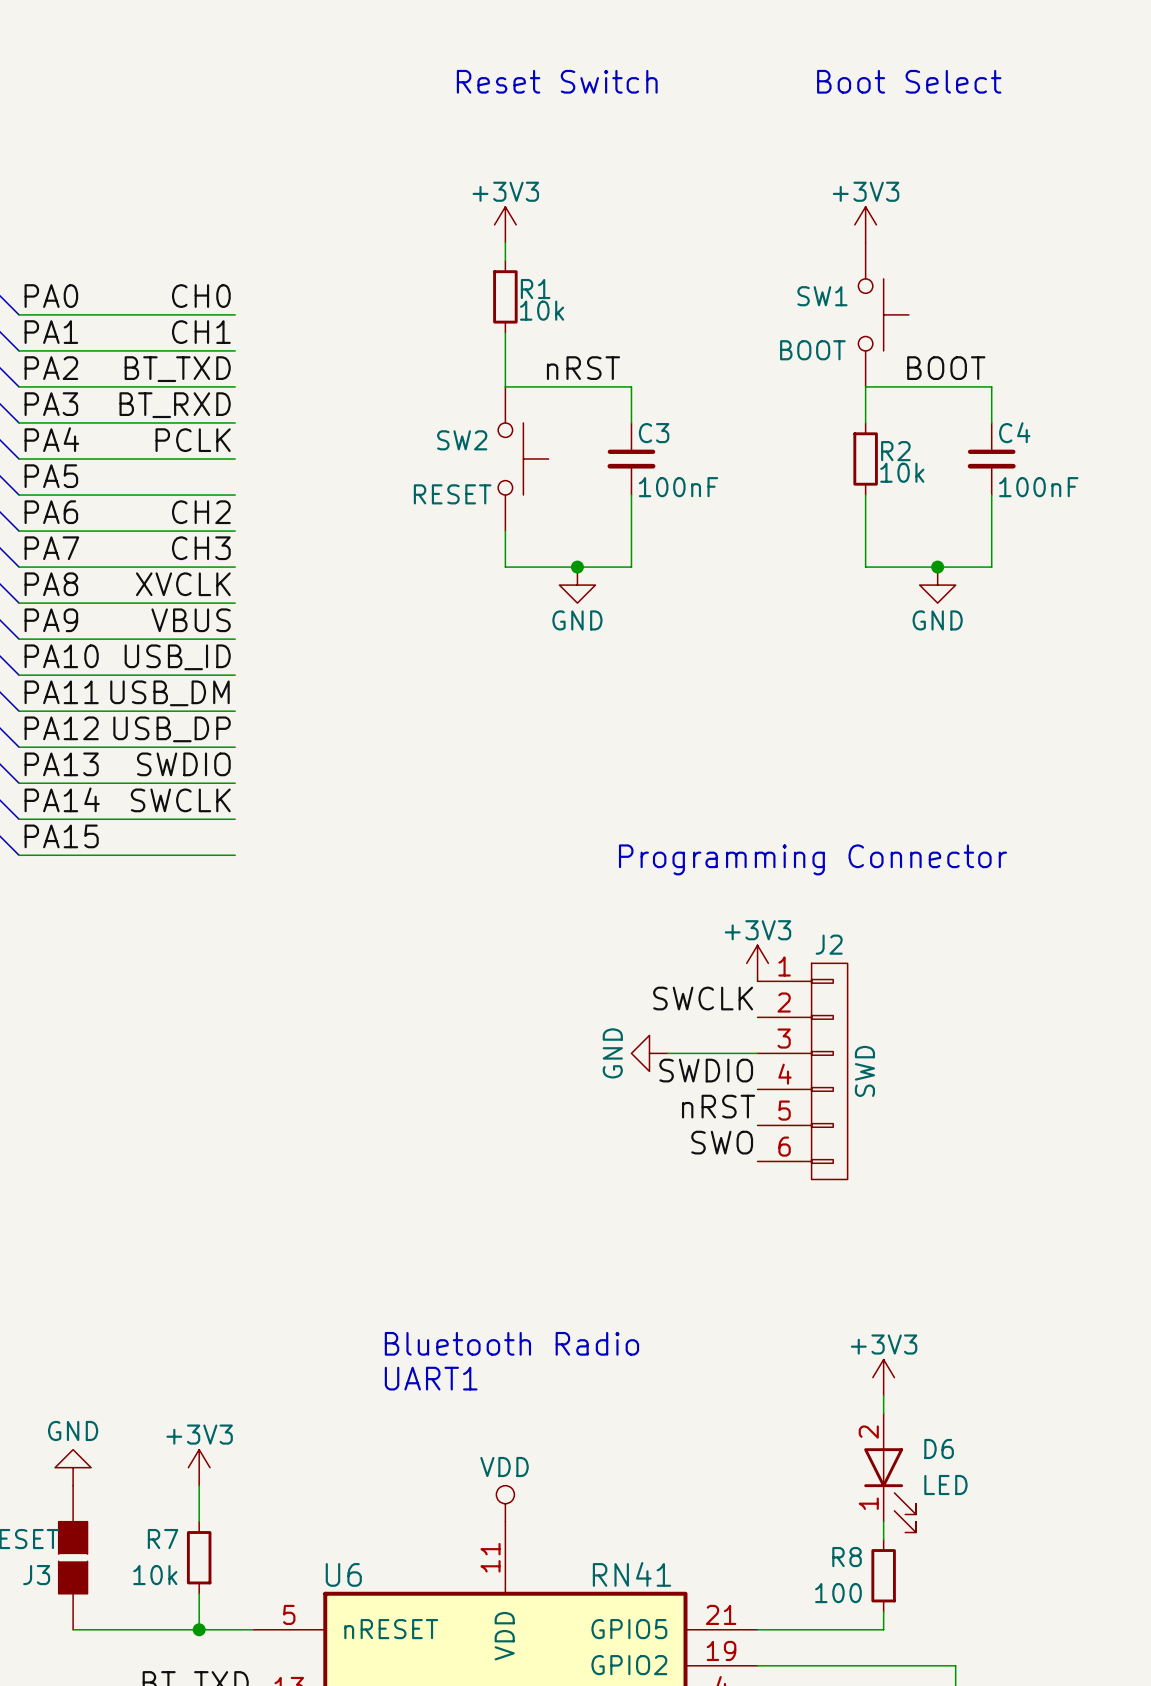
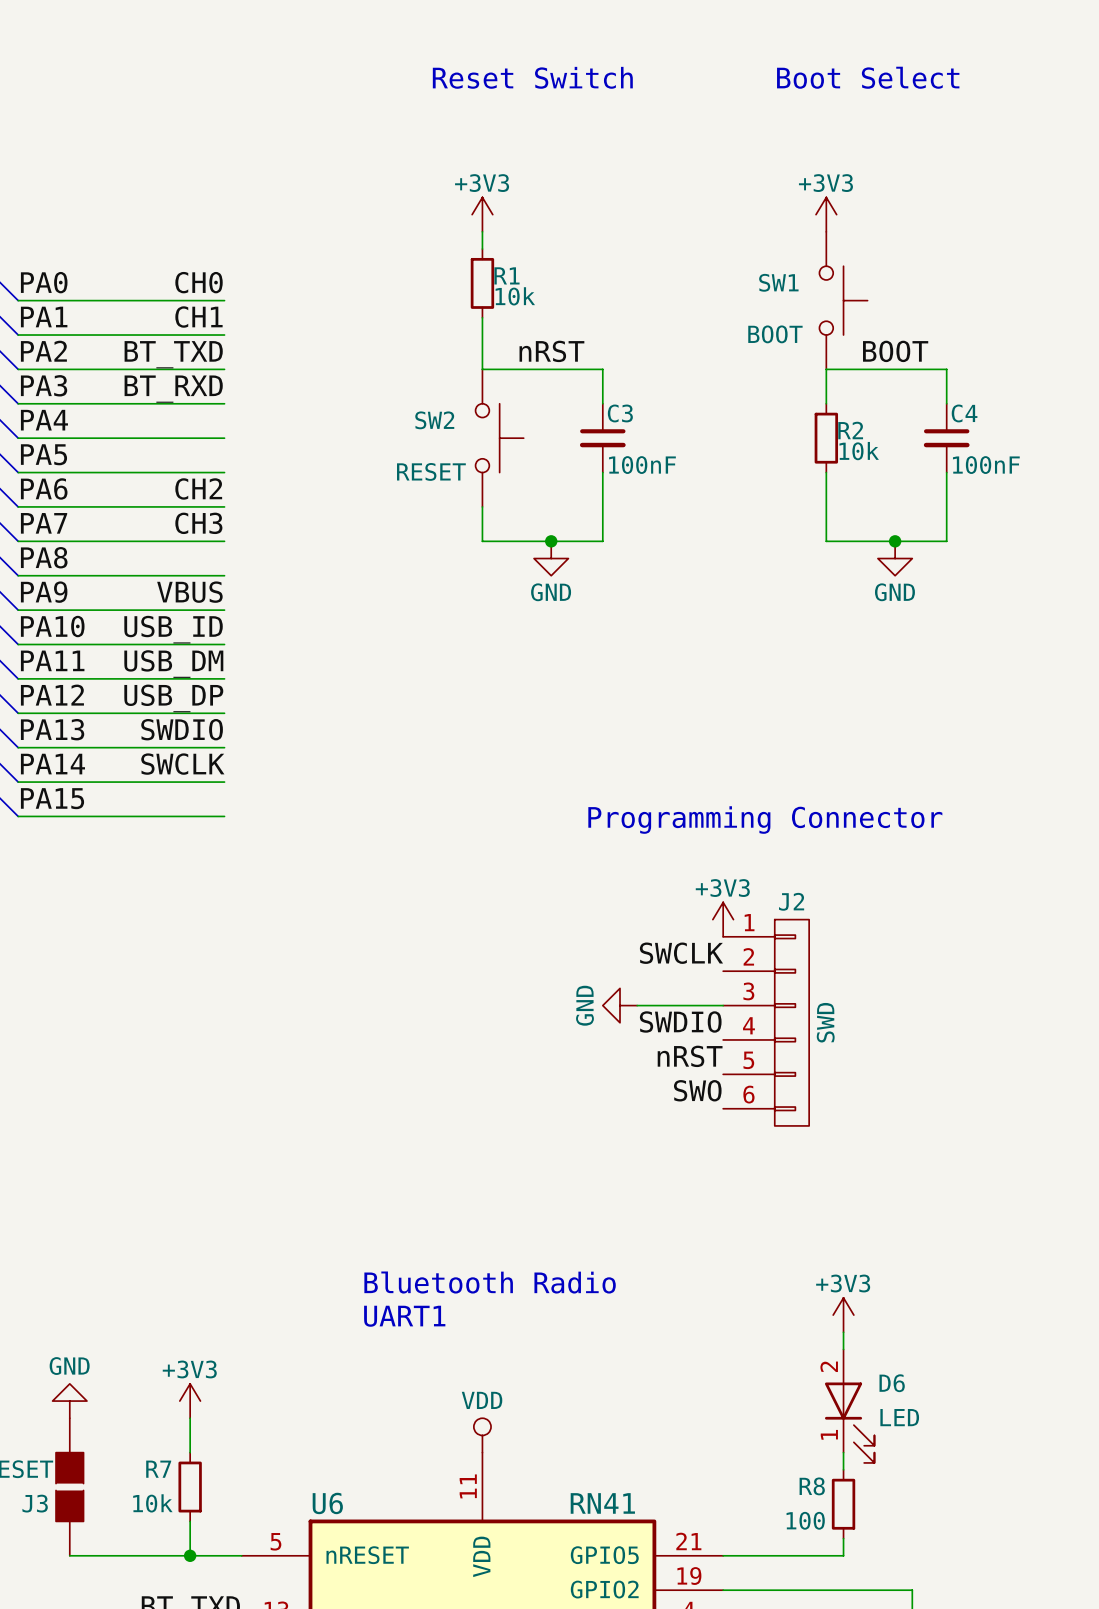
label: PCLK (193, 440) -> none
label: XVCLK (183, 584) -> none

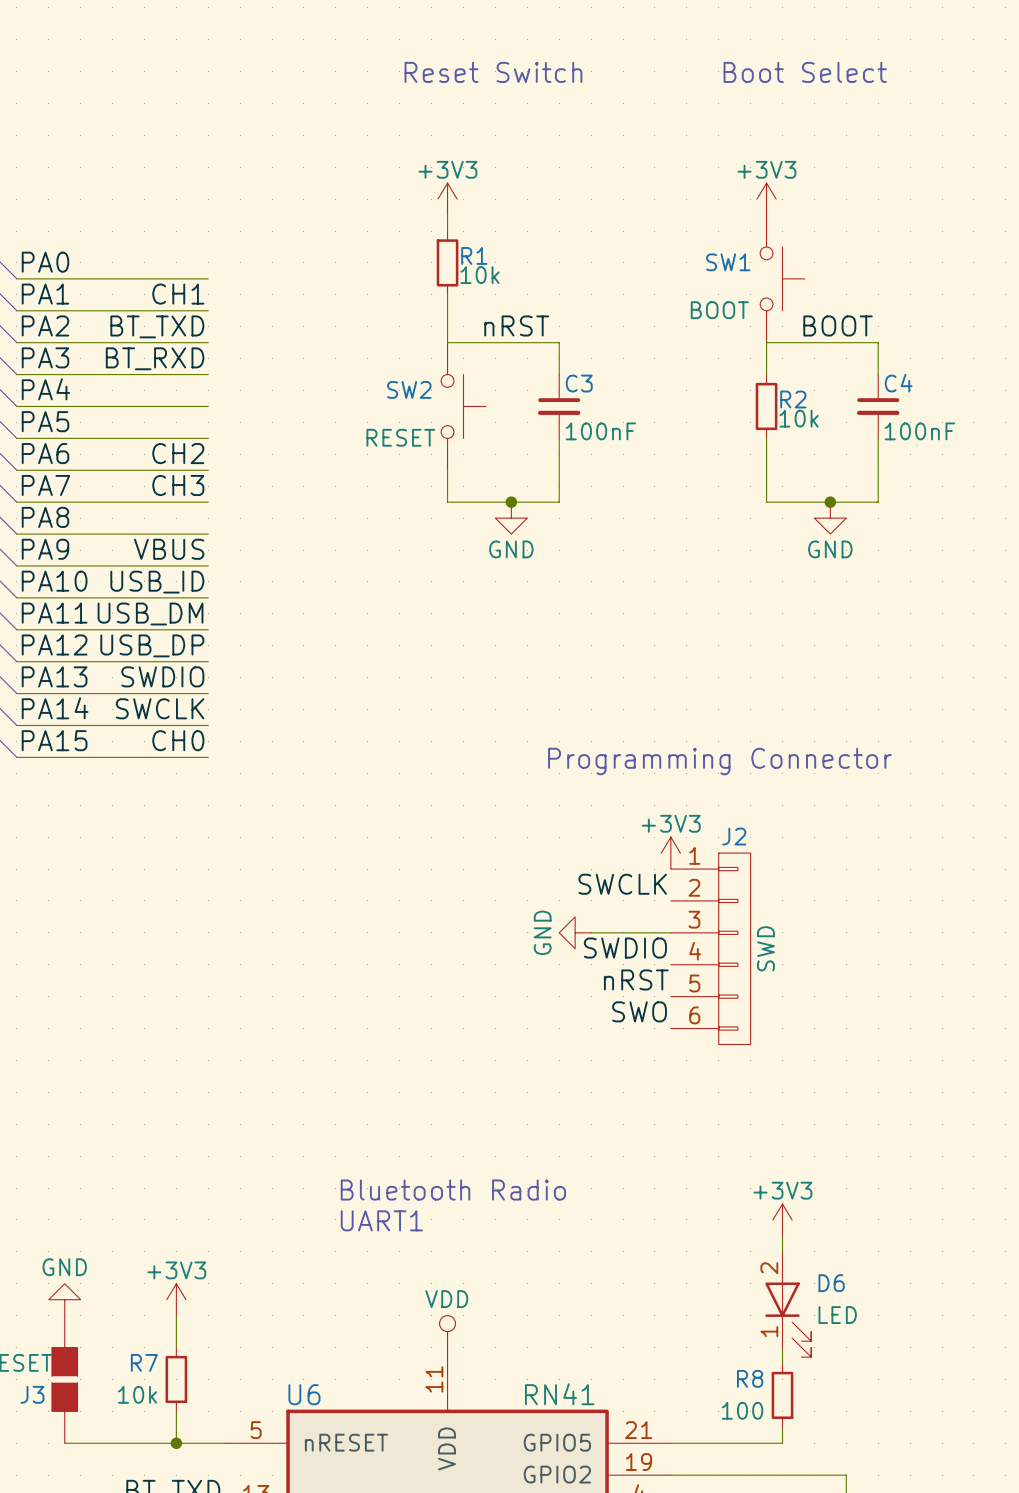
label: CH0 (199, 282) -> none
label: none -> CH0 (178, 740)

